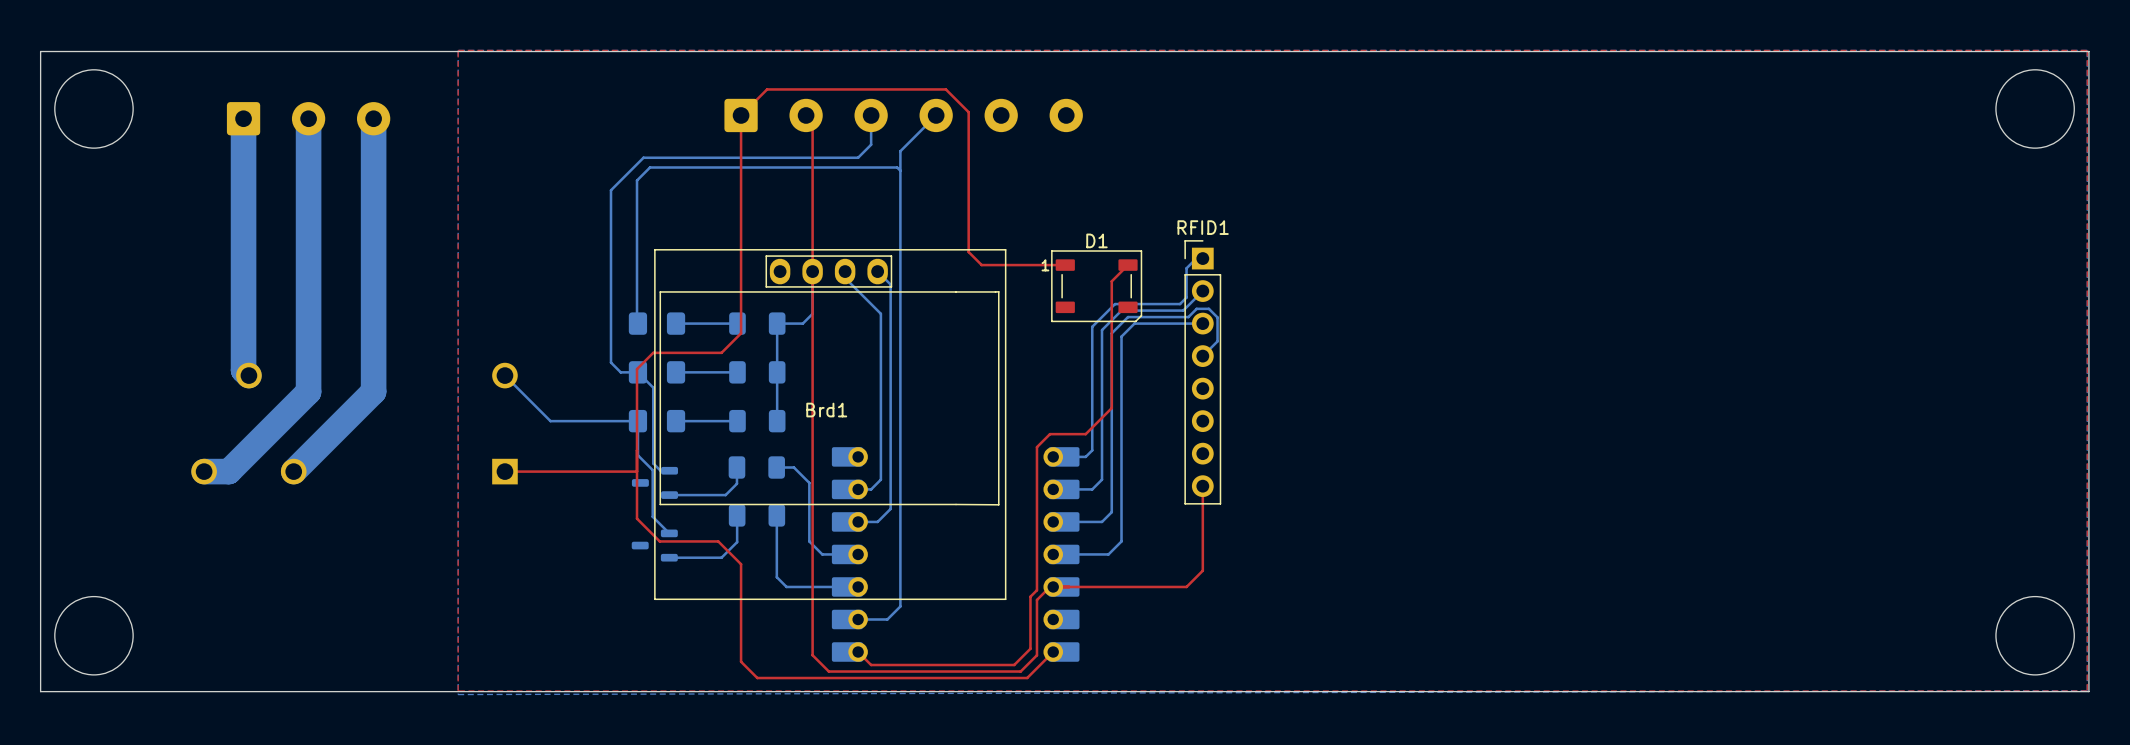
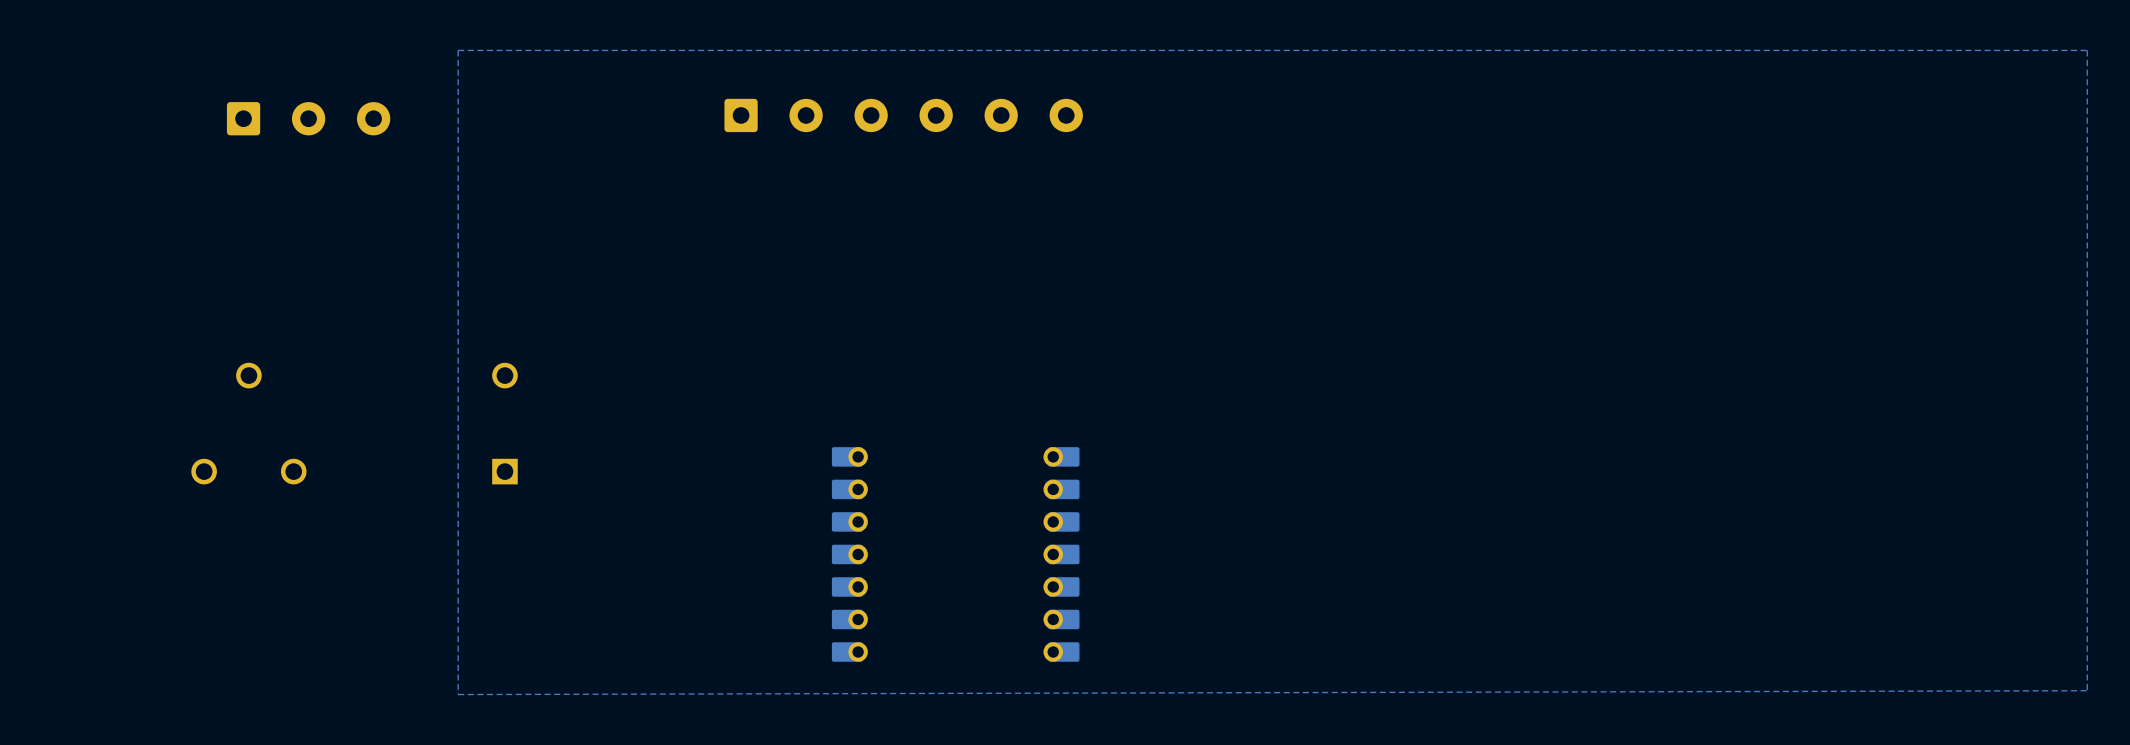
top zone outline: (458, 50) (458, 691) (2087, 691) (2087, 50) (458, 50) -> none
board edge: (40, 51) (40, 691) (2088, 691) (2088, 51) (40, 51) -> none
round board edge: [54, 69, 134, 149] -> none
round board edge: [1995, 69, 2075, 149] -> none
top track: (806, 115) (812, 121) (812, 655) (828, 671) (1020, 671) (1036, 655) (1036, 599) (1049, 586) (1186, 586) (1202, 570) (1202, 486) -> none
bottom track: (871, 115) (871, 144) (858, 157) (643, 157) (610, 190) (610, 362) (620, 372) (637, 372) (653, 387) (653, 463) (660, 470) (669, 470) -> none
bottom track: (936, 115) (900, 151) (900, 606) (887, 619) (847, 619) -> none
bottom track: (243, 128) (243, 370) (248, 375) -> none
bottom track: (308, 128) (308, 391) (228, 471) (204, 471) -> none
bottom track: (373, 128) (373, 391) (293, 471) -> none
bottom track: (900, 170) (897, 167) (650, 167) (637, 180) (637, 323) -> none
bottom track: (1202, 258) (1196, 258) (1186, 268) (1186, 297) (1180, 304) (1115, 304) (1092, 326) (1092, 450) (1085, 456) (1063, 456) -> none
bottom track: (806, 265) (812, 271) (812, 313) (802, 323) (777, 323) (777, 421) -> none
top track: (1065, 265) (981, 265) (968, 252) (968, 112) (945, 89) (767, 89) (741, 115) (741, 333) (721, 352) (653, 352) (637, 369) (637, 518) (659, 541) (718, 541) (741, 564) (741, 661) (757, 678) (1027, 678) (1053, 652) -> none
top track: (1128, 265) (1111, 281) (1111, 408) (1085, 434) (1049, 434) (1036, 447) (1036, 590) (1030, 596) (1030, 648) (1014, 665) (871, 665) (858, 652) -> none
bottom track: (845, 271) (845, 278) (880, 313) (880, 479) (871, 489) (847, 489) -> none
bottom track: (877, 271) (890, 284) (890, 508) (877, 521) (858, 521) -> none
D1: (1096, 286) -> none
bottom track: (1202, 291) (1183, 310) (1121, 310) (1102, 330) (1102, 479) (1092, 489) (1063, 489) -> none
part: (656, 323) -> none
bottom track: (676, 323) (737, 323) -> none
part: (757, 323) -> none
bottom track: (1202, 323) (1134, 323) (1121, 336) (1121, 541) (1108, 554) (1063, 554) -> none
bottom track: (1202, 356) (1217, 341) (1217, 317) (1208, 308) (1196, 308) (1188, 317) (1128, 317) (1111, 333) (1111, 512) (1102, 521) (1063, 521) -> none
part: (656, 372) -> none
bottom track: (676, 372) (737, 372) -> none
part: (757, 372) -> none
RFID1: (1202, 372) -> none
bottom track: (504, 375) (550, 421) (637, 421) (637, 455) (652, 470) (652, 516) (669, 533) -> none
part: (656, 421) -> none
bottom track: (676, 421) (737, 421) -> none
part: (757, 421) -> none
Brd1: (830, 424) -> none
part: (756, 467) -> none
bottom track: (776, 467) (793, 467) (809, 482) (809, 541) (822, 554) (847, 554) -> none
top track: (504, 471) (637, 471) -> none
bottom track: (731, 473) (736, 467) (736, 483) (725, 495) (669, 495) -> none
part: (654, 482) -> none
bottom track: (737, 515) (737, 542) (721, 557) (669, 557) -> none
part: (756, 515) -> none
bottom track: (776, 515) (776, 577) (786, 586) (835, 586) (838, 590) (841, 586) (847, 586) -> none
part: (654, 545) -> none
round board edge: [54, 596, 134, 676] -> none
round board edge: [1995, 596, 2075, 676] -> none

